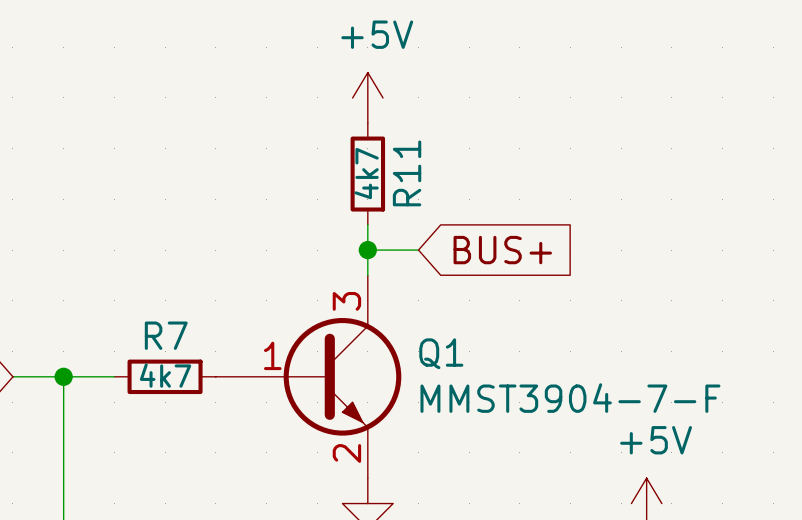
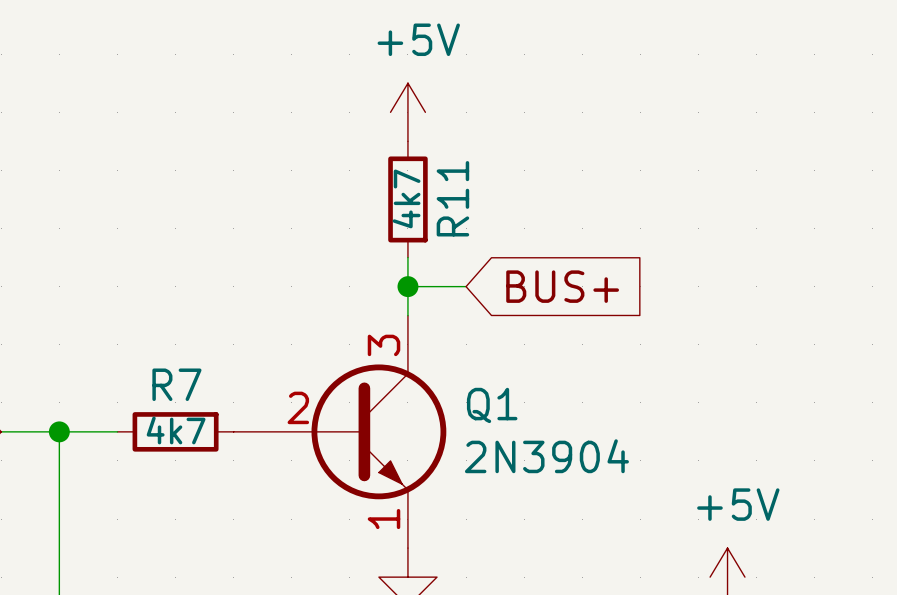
Q1 pin number: 1 (272, 355) -> 2 (298, 407)
Q1 value: MMST3904-7-F (570, 398) -> 2N3904 (546, 456)
Q1 pin number: 2 (346, 453) -> 1 (384, 519)

